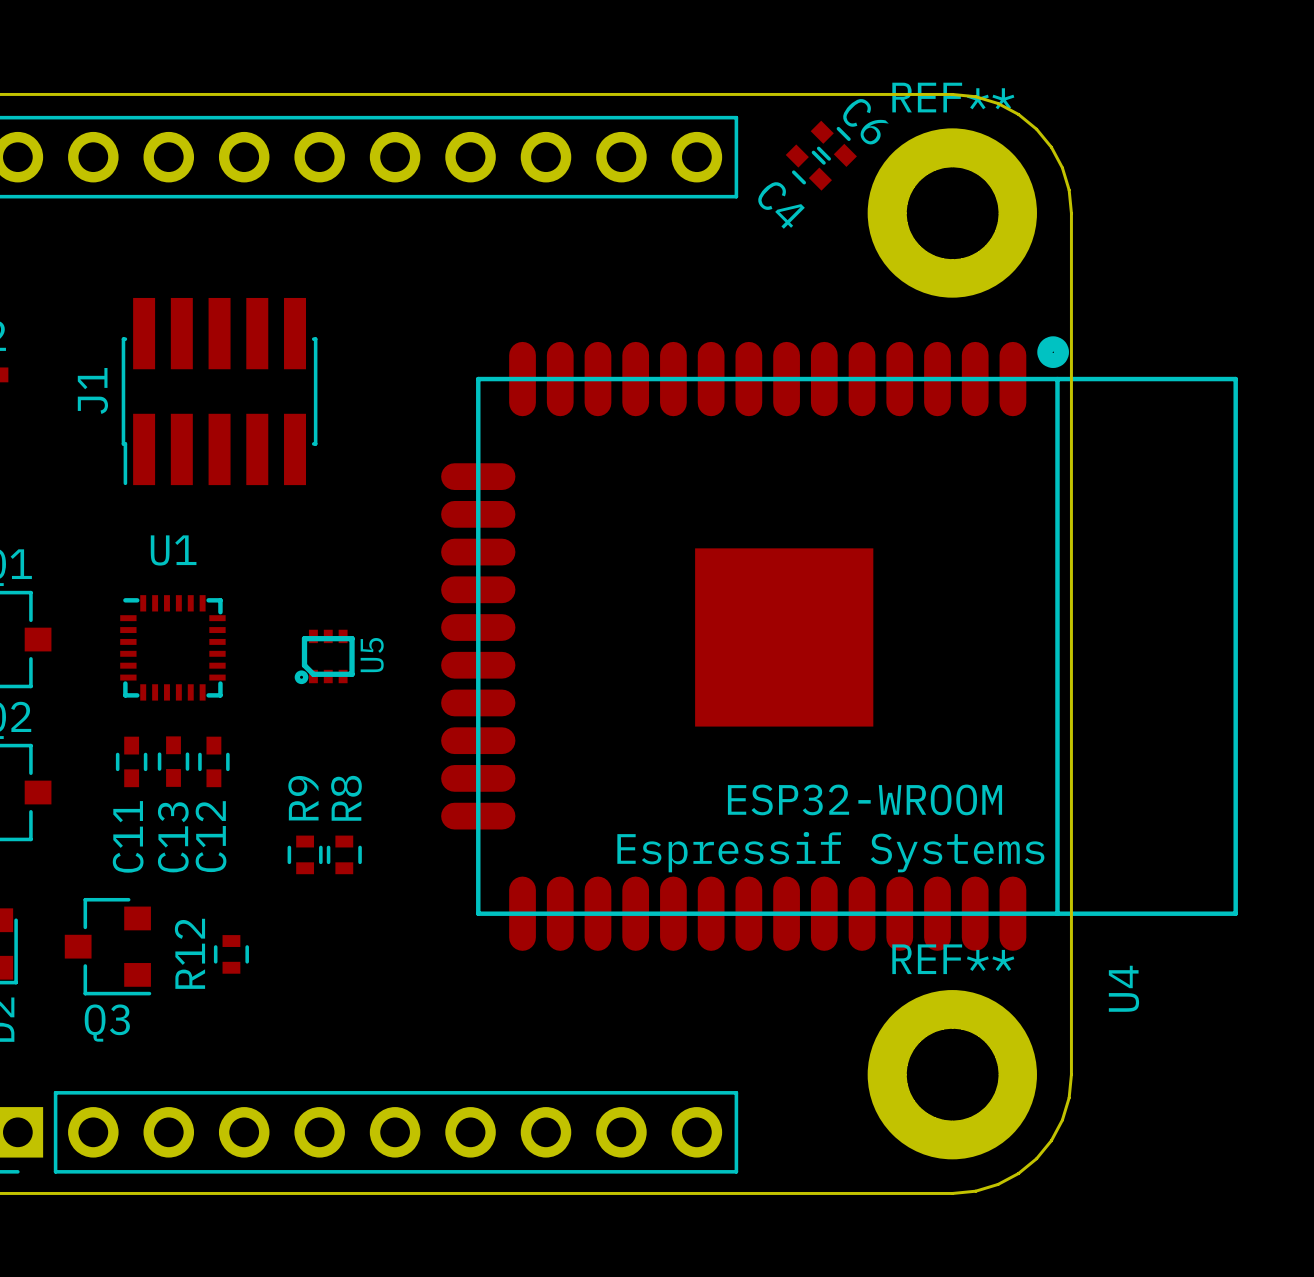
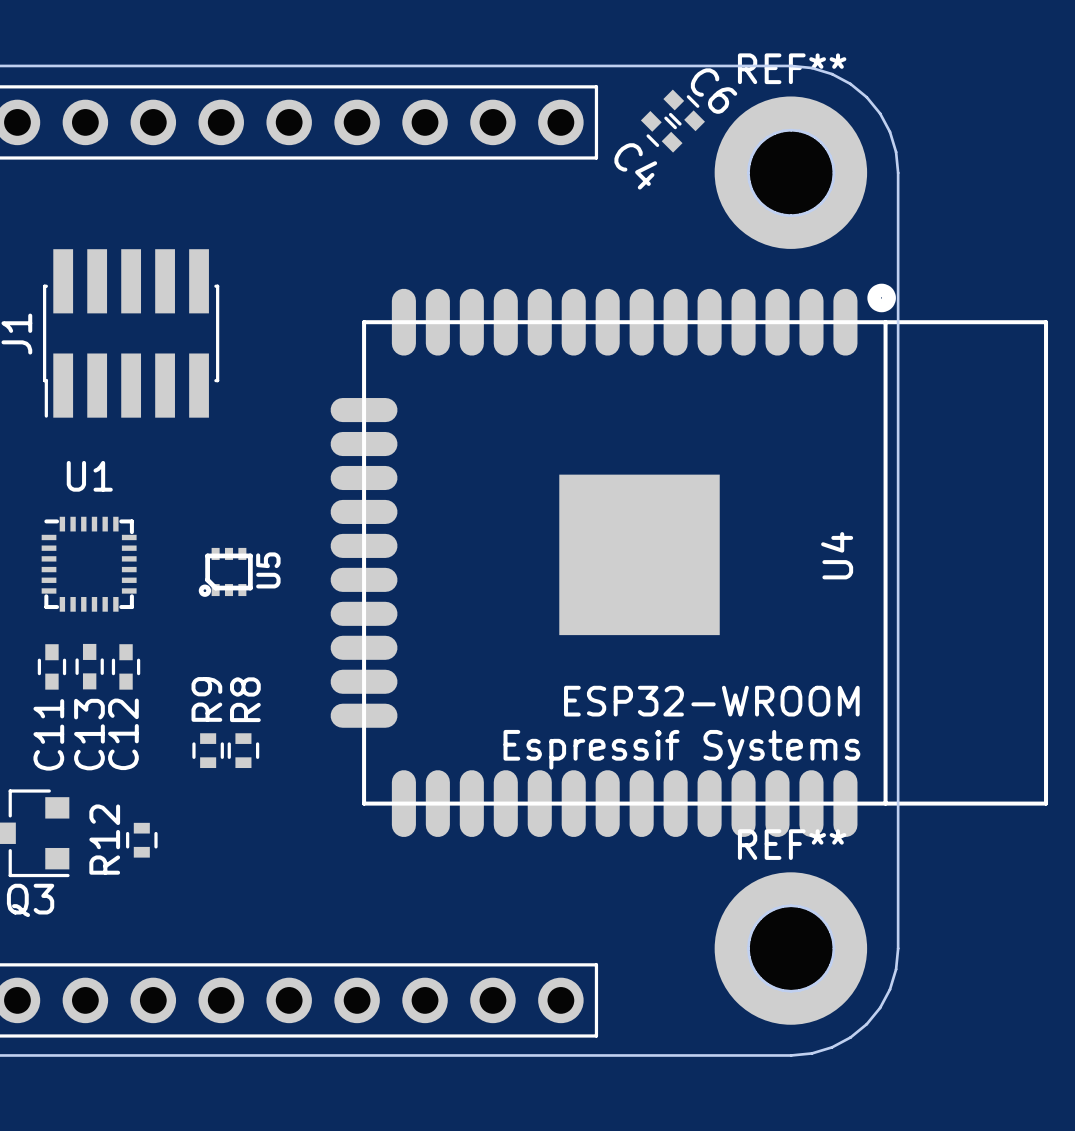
U4 name position: U4 (1123, 988) -> U4 (837, 555)

